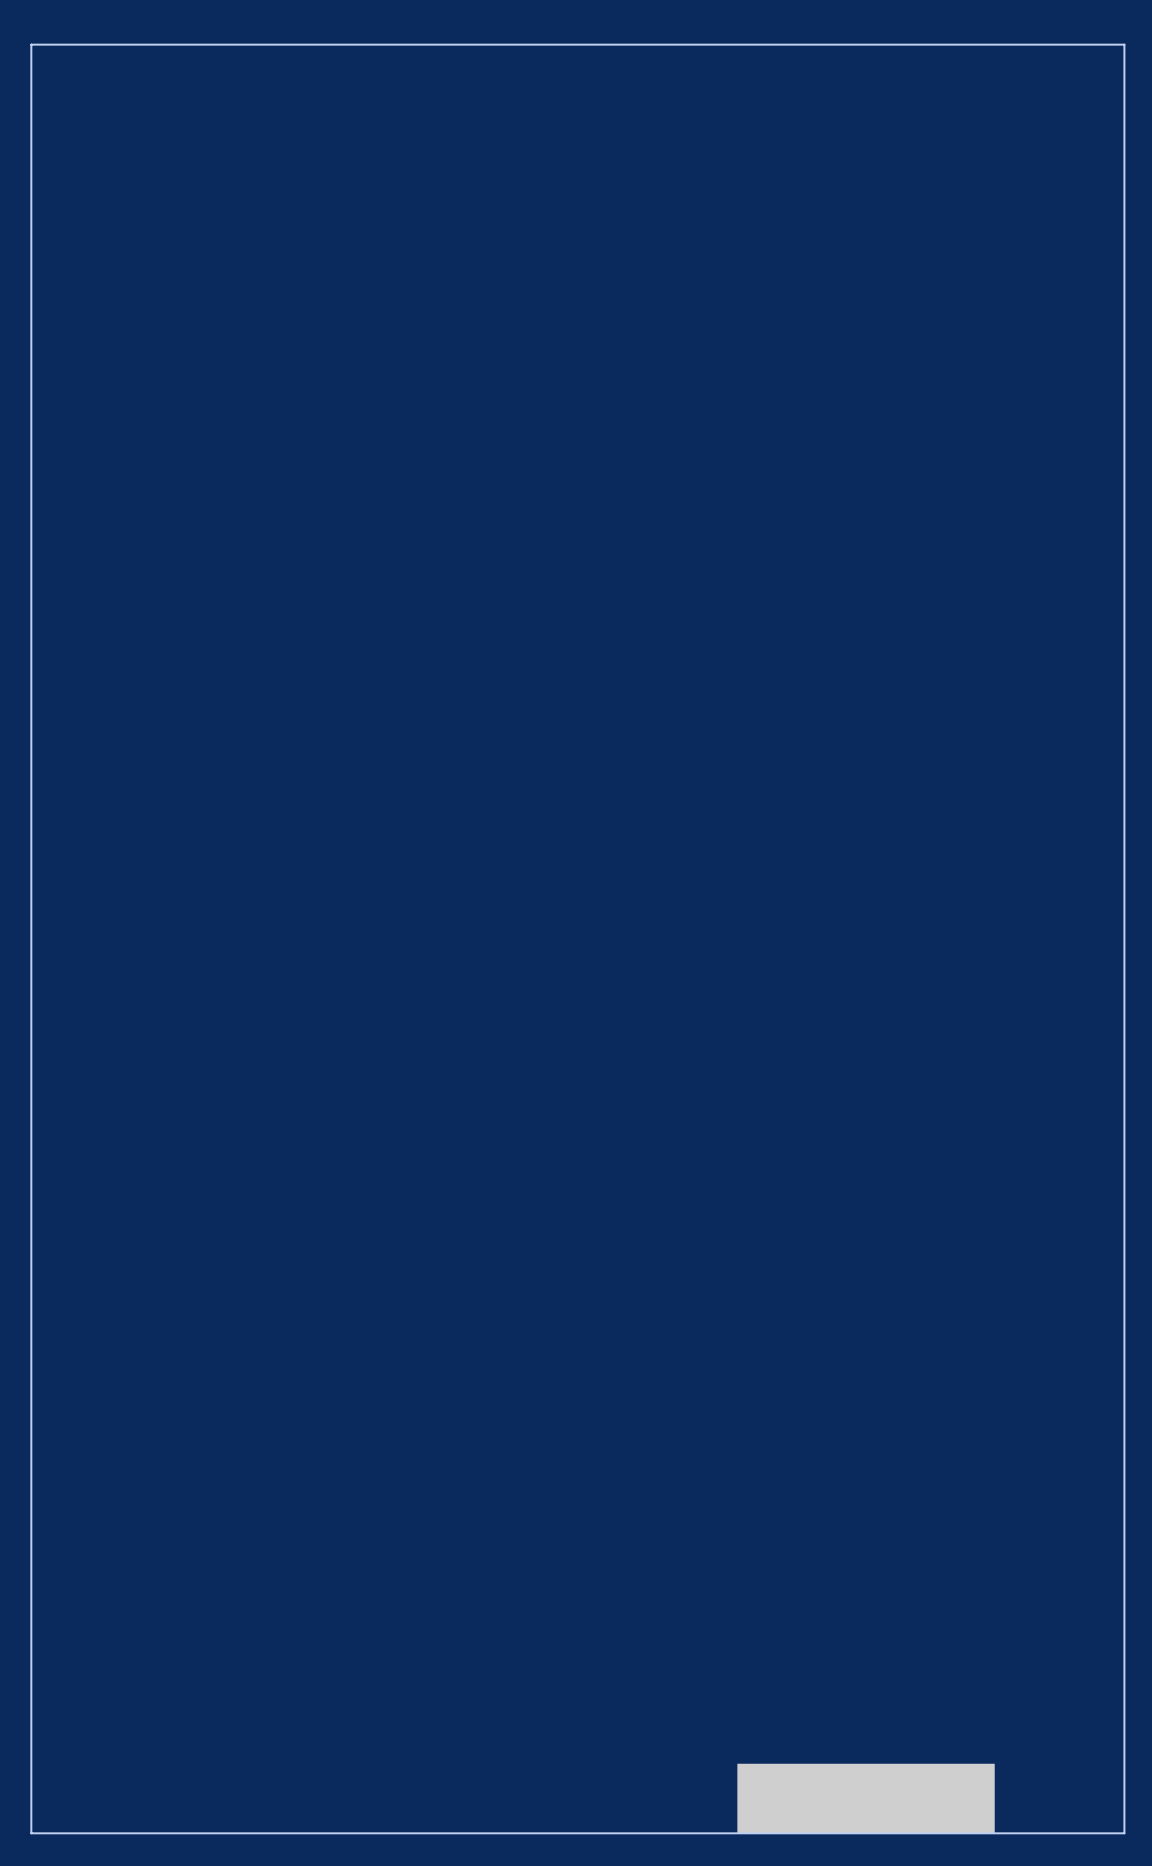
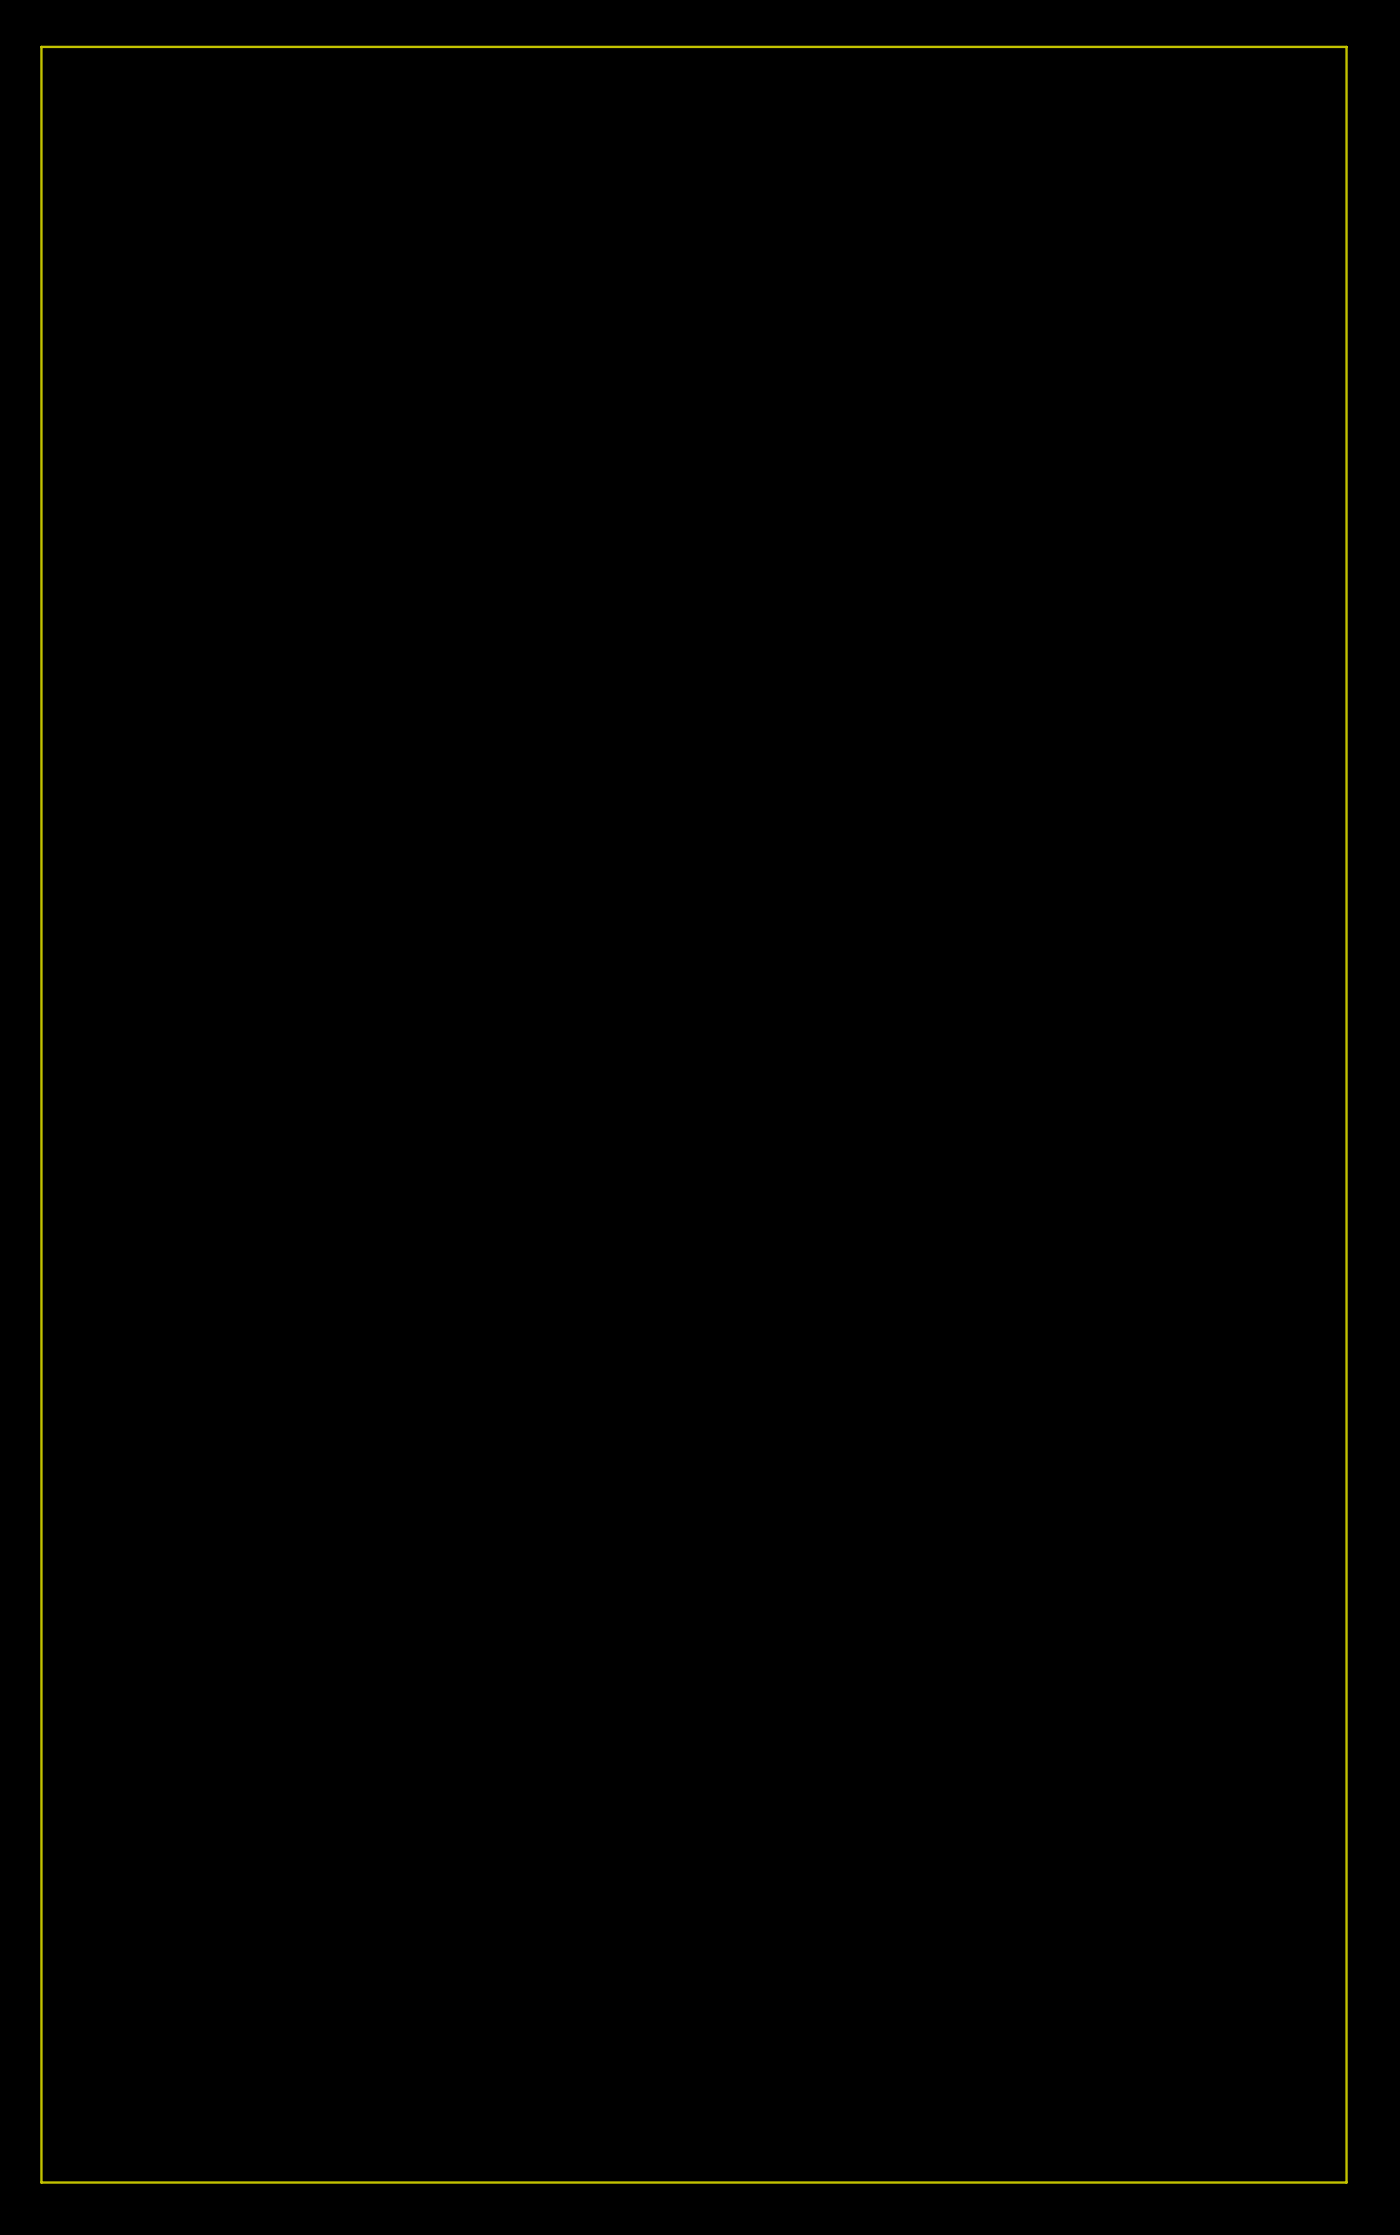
part: (866, 1798) -> none

